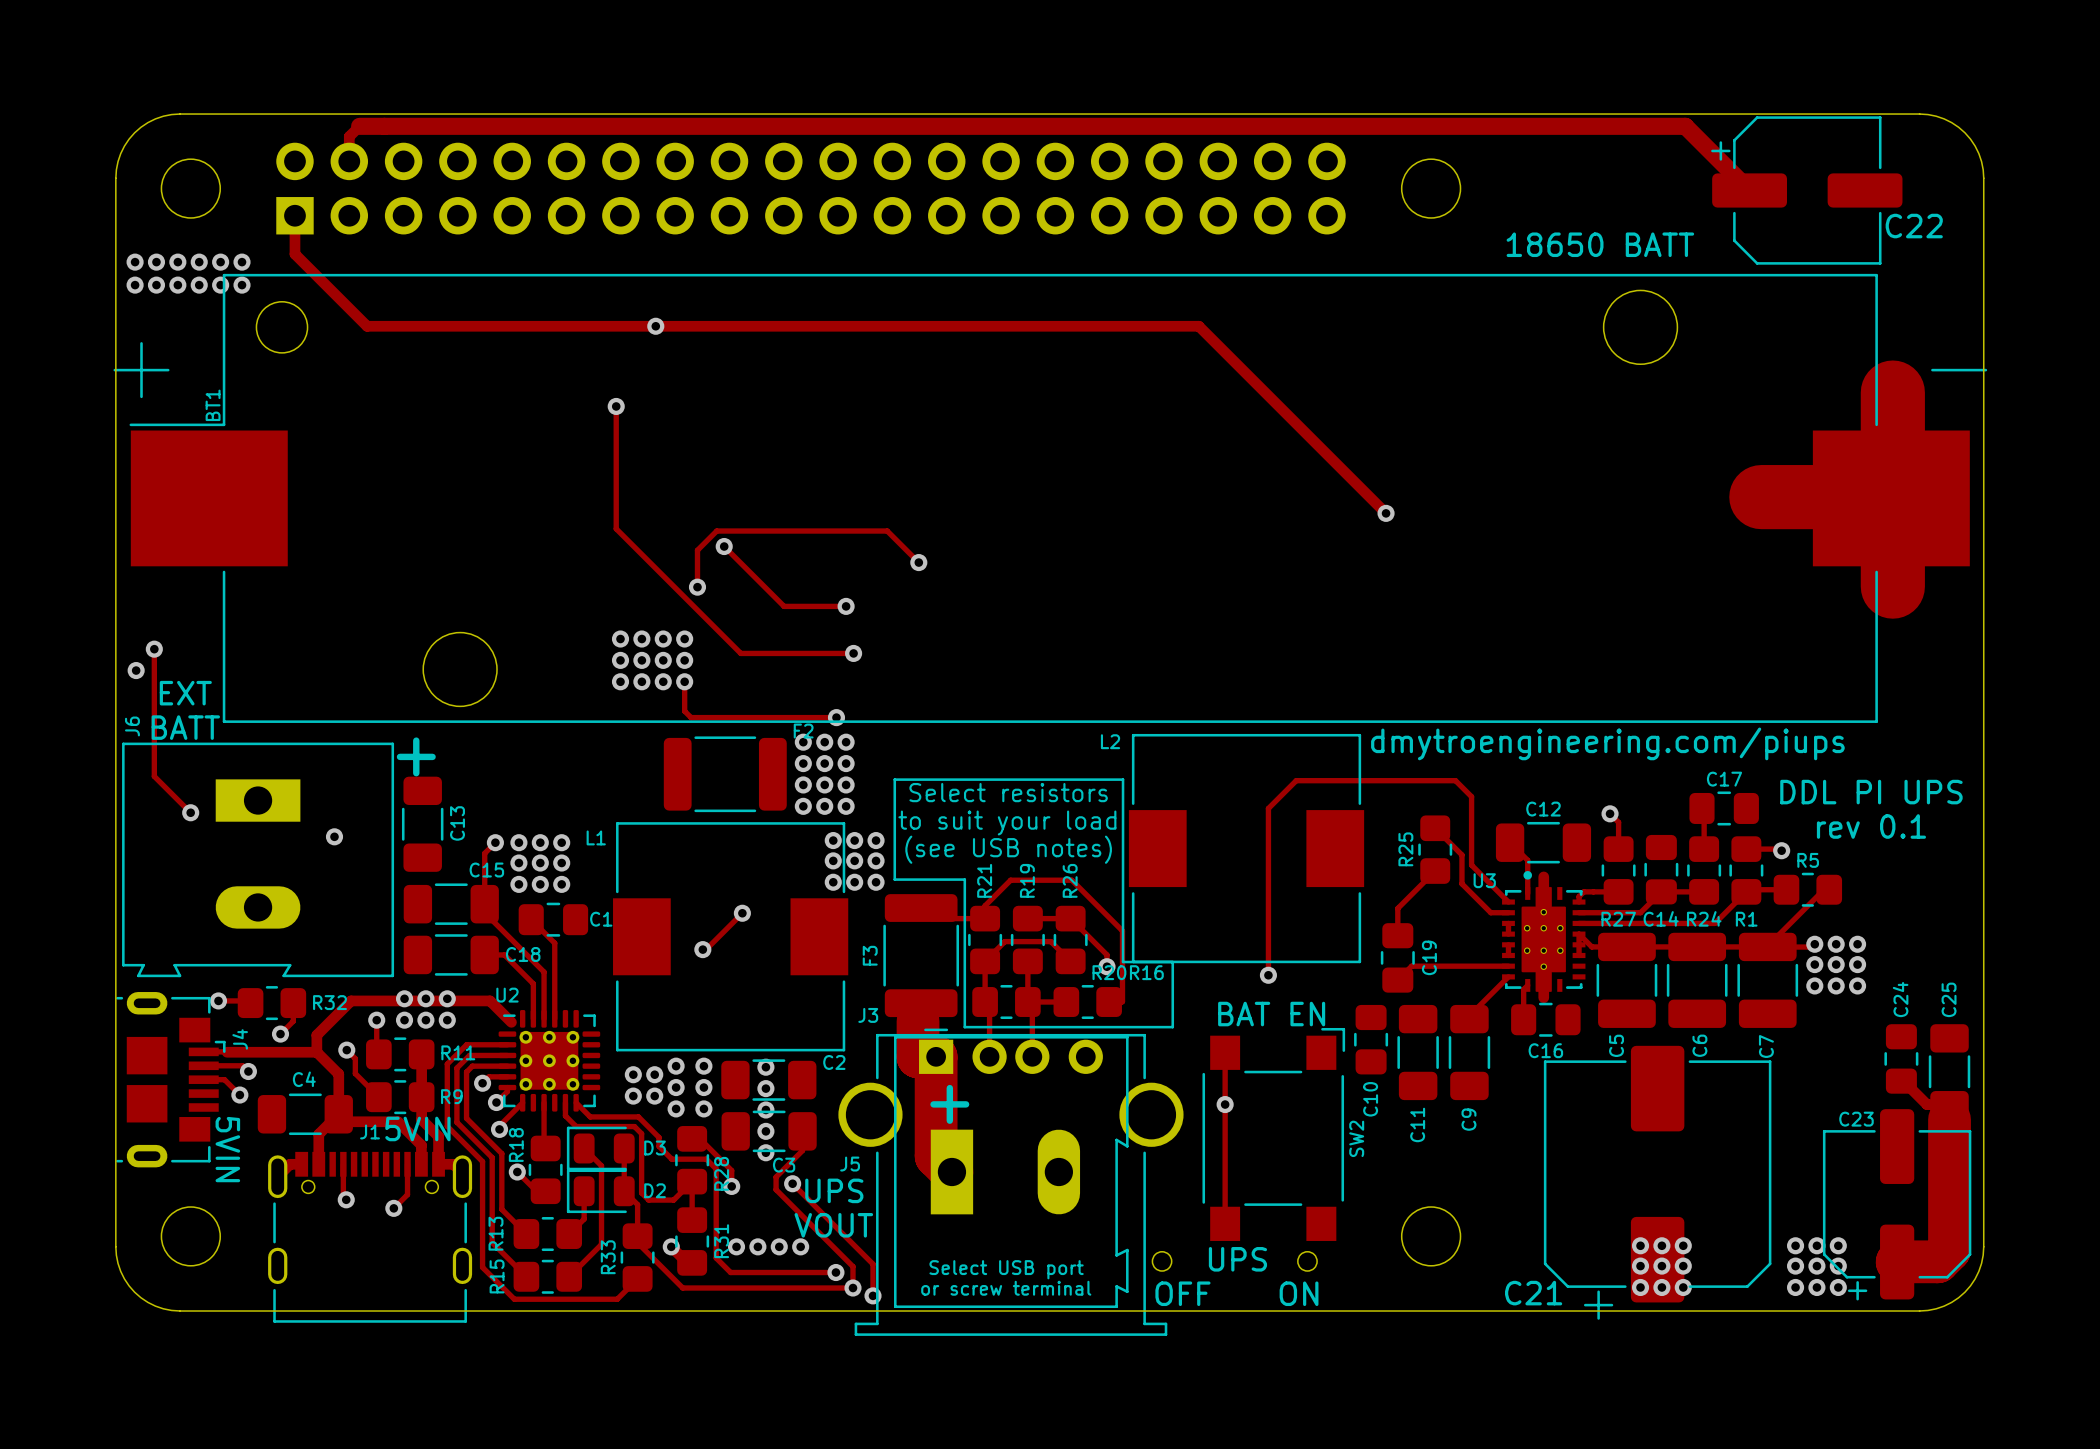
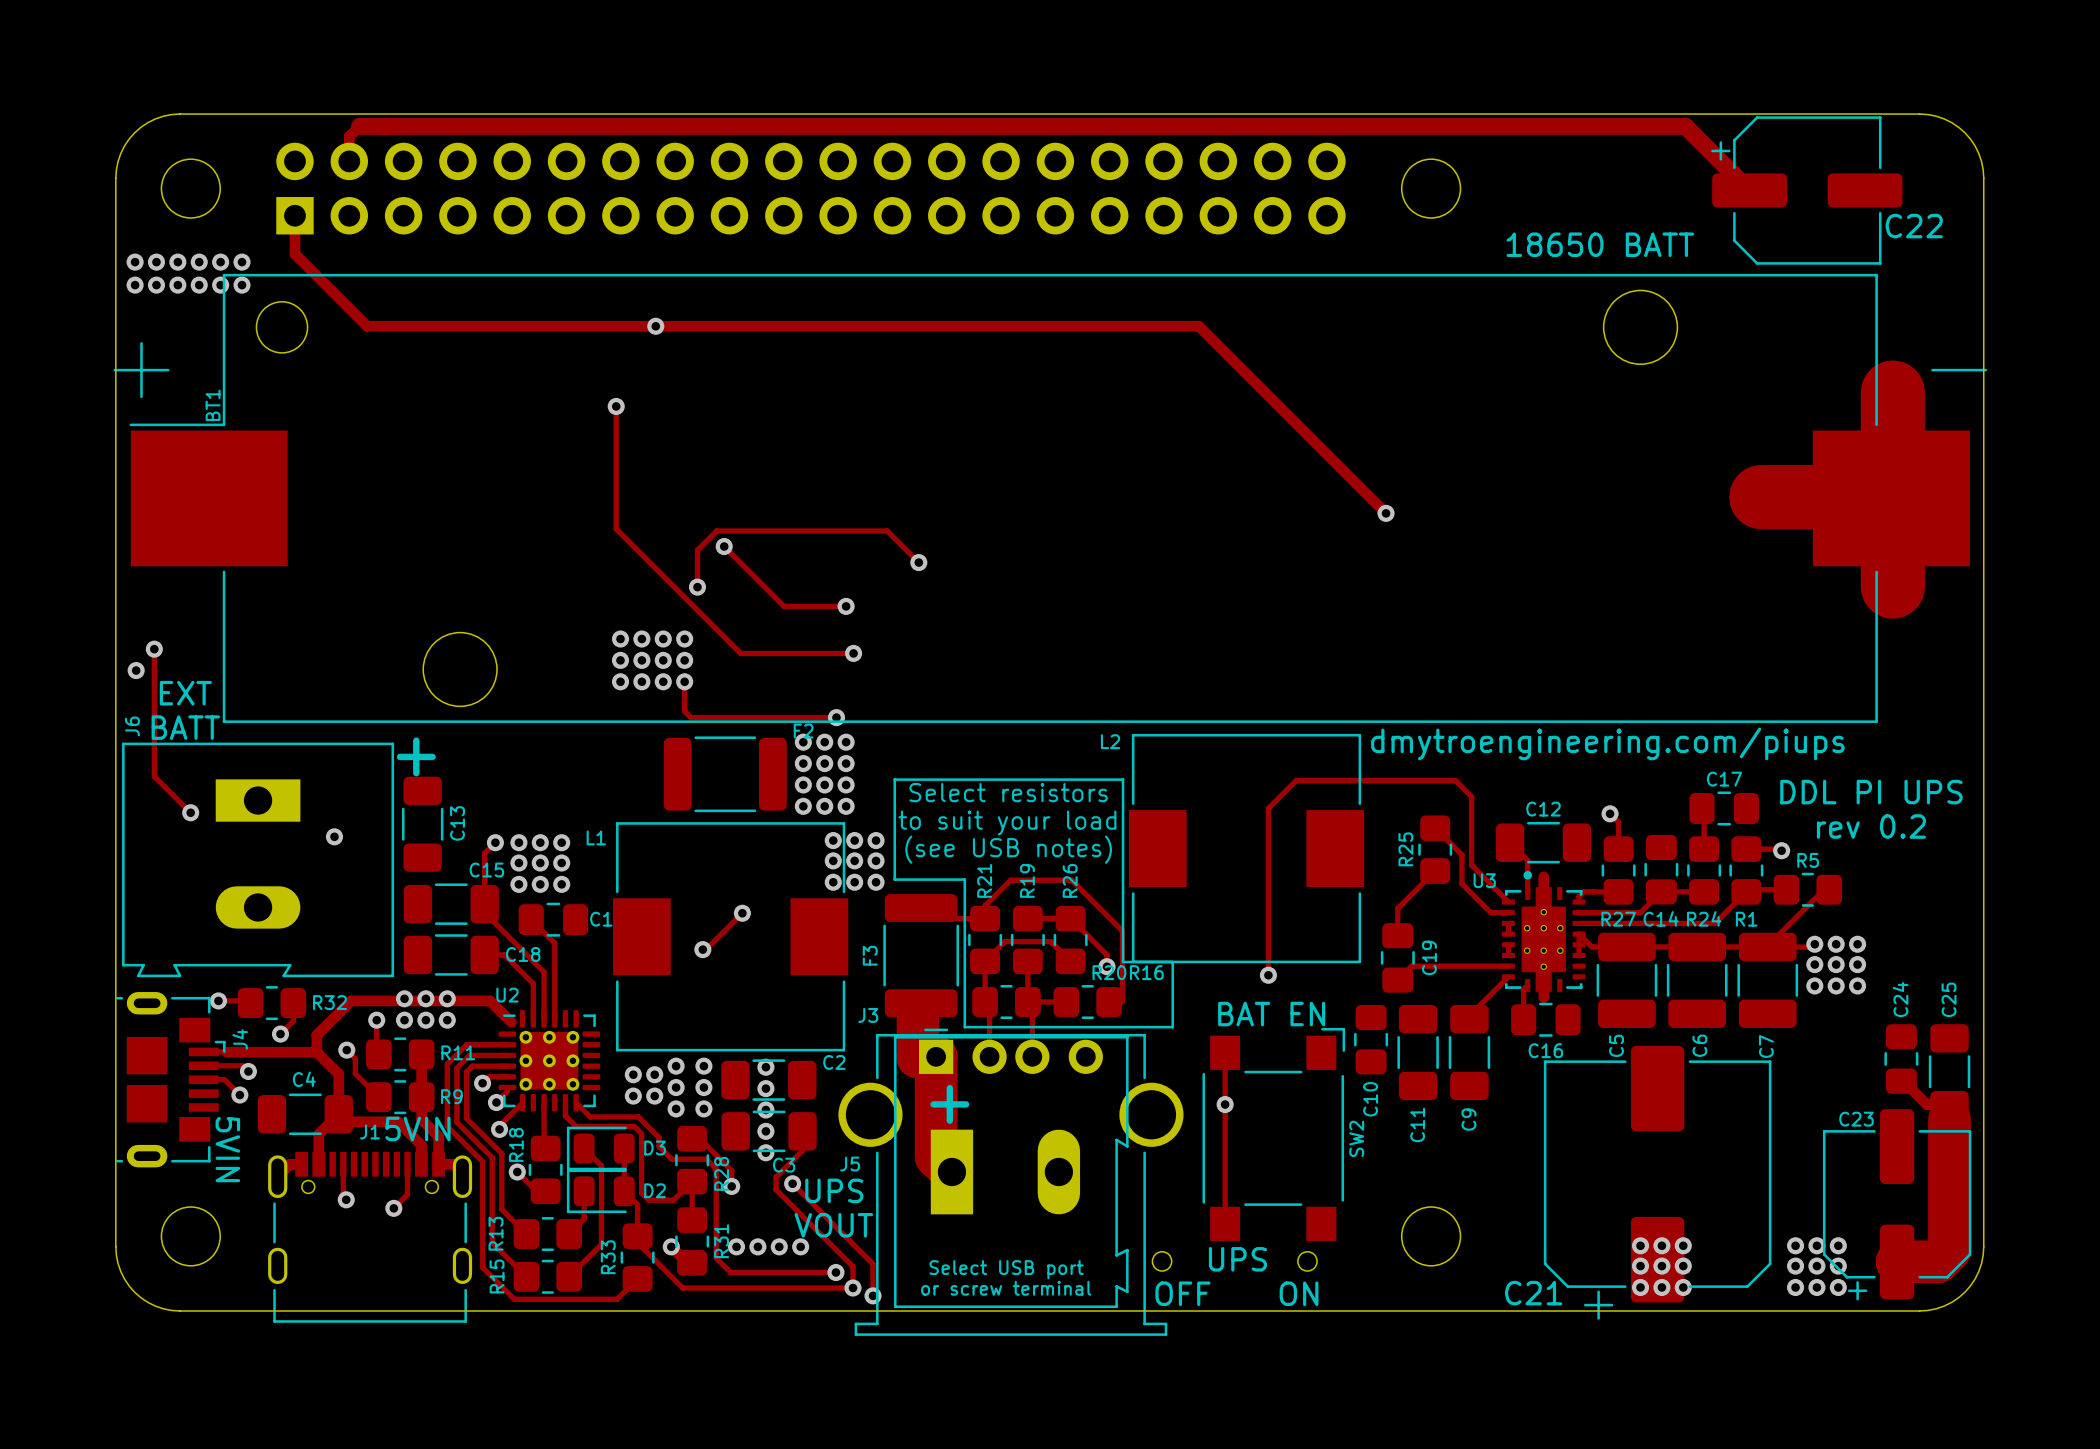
text: rev 0.1 (1871, 826) -> rev 0.2 (1871, 826)

